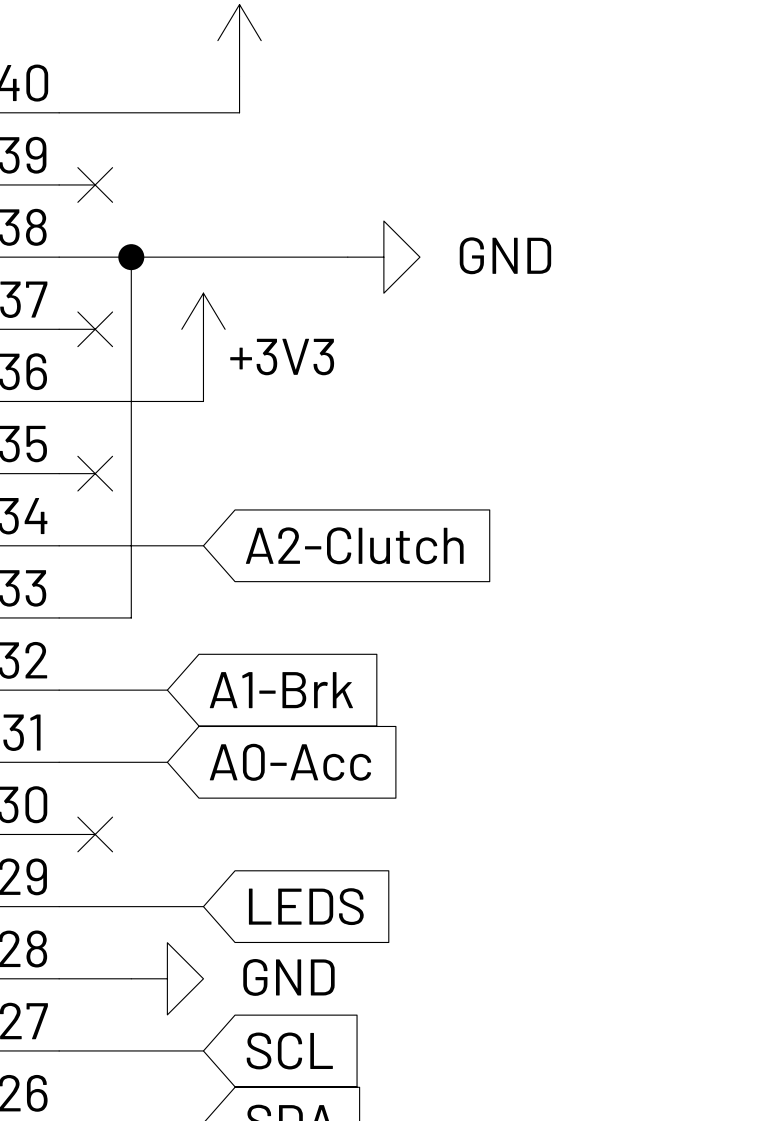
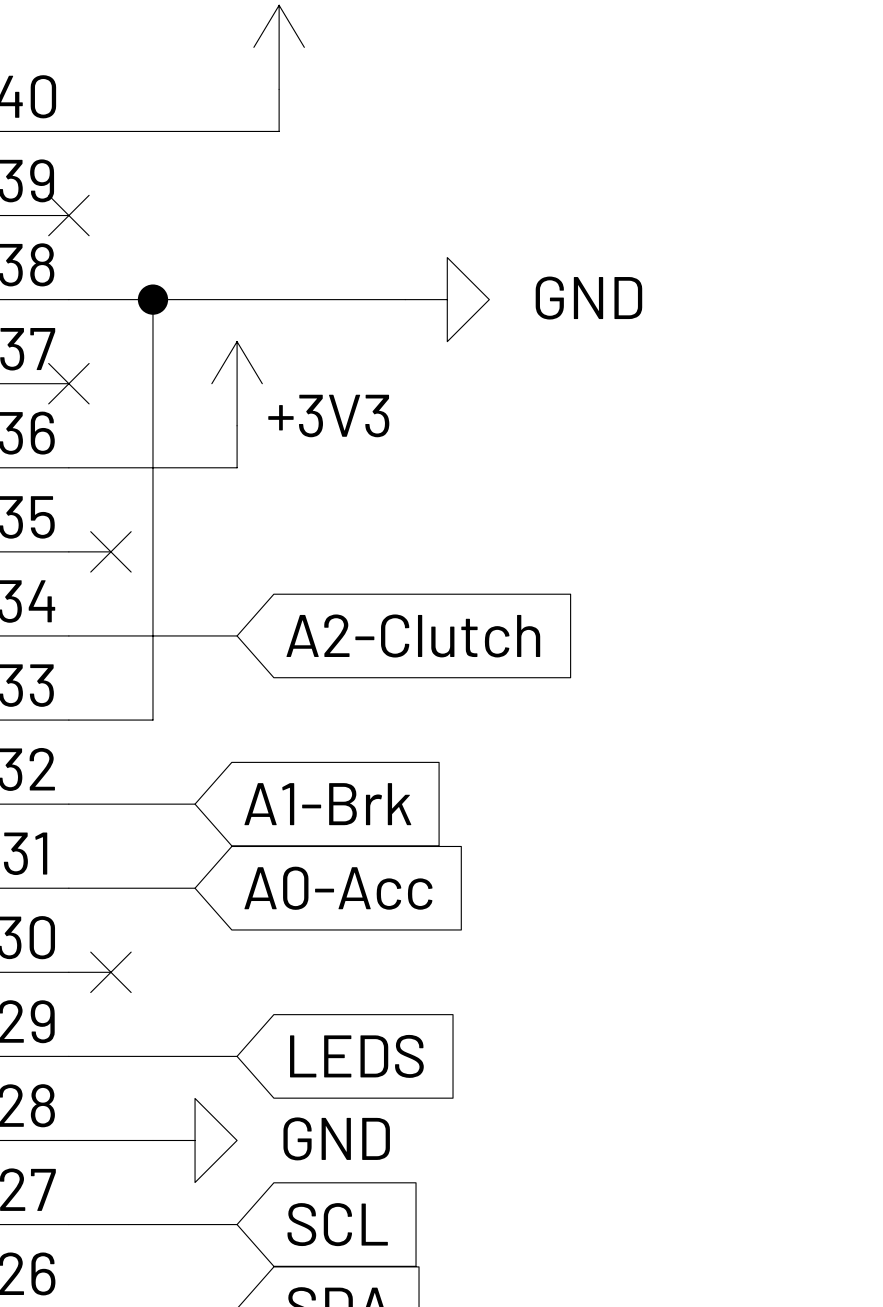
wire: (59, 184) (95, 184) -> none
no-connect mark position: (95, 184) -> (68, 215)
wire: (59, 329) (95, 329) -> none
no-connect mark position: (95, 329) -> (68, 383)

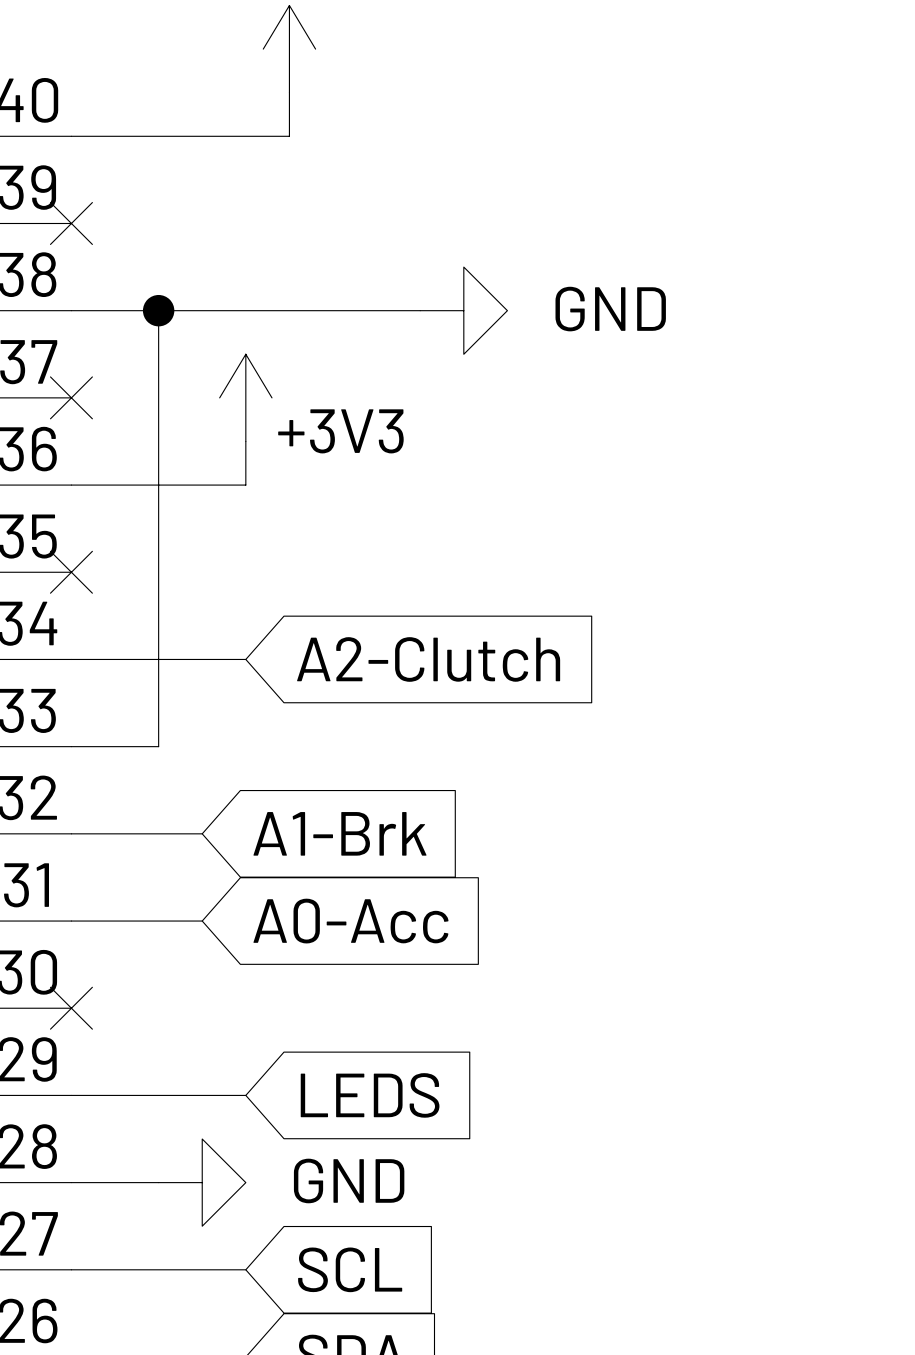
wire: (68, 551) (110, 551) -> none
no-connect mark position: (110, 551) -> (71, 572)
wire: (68, 972) (110, 972) -> none
no-connect mark position: (110, 972) -> (71, 1008)

